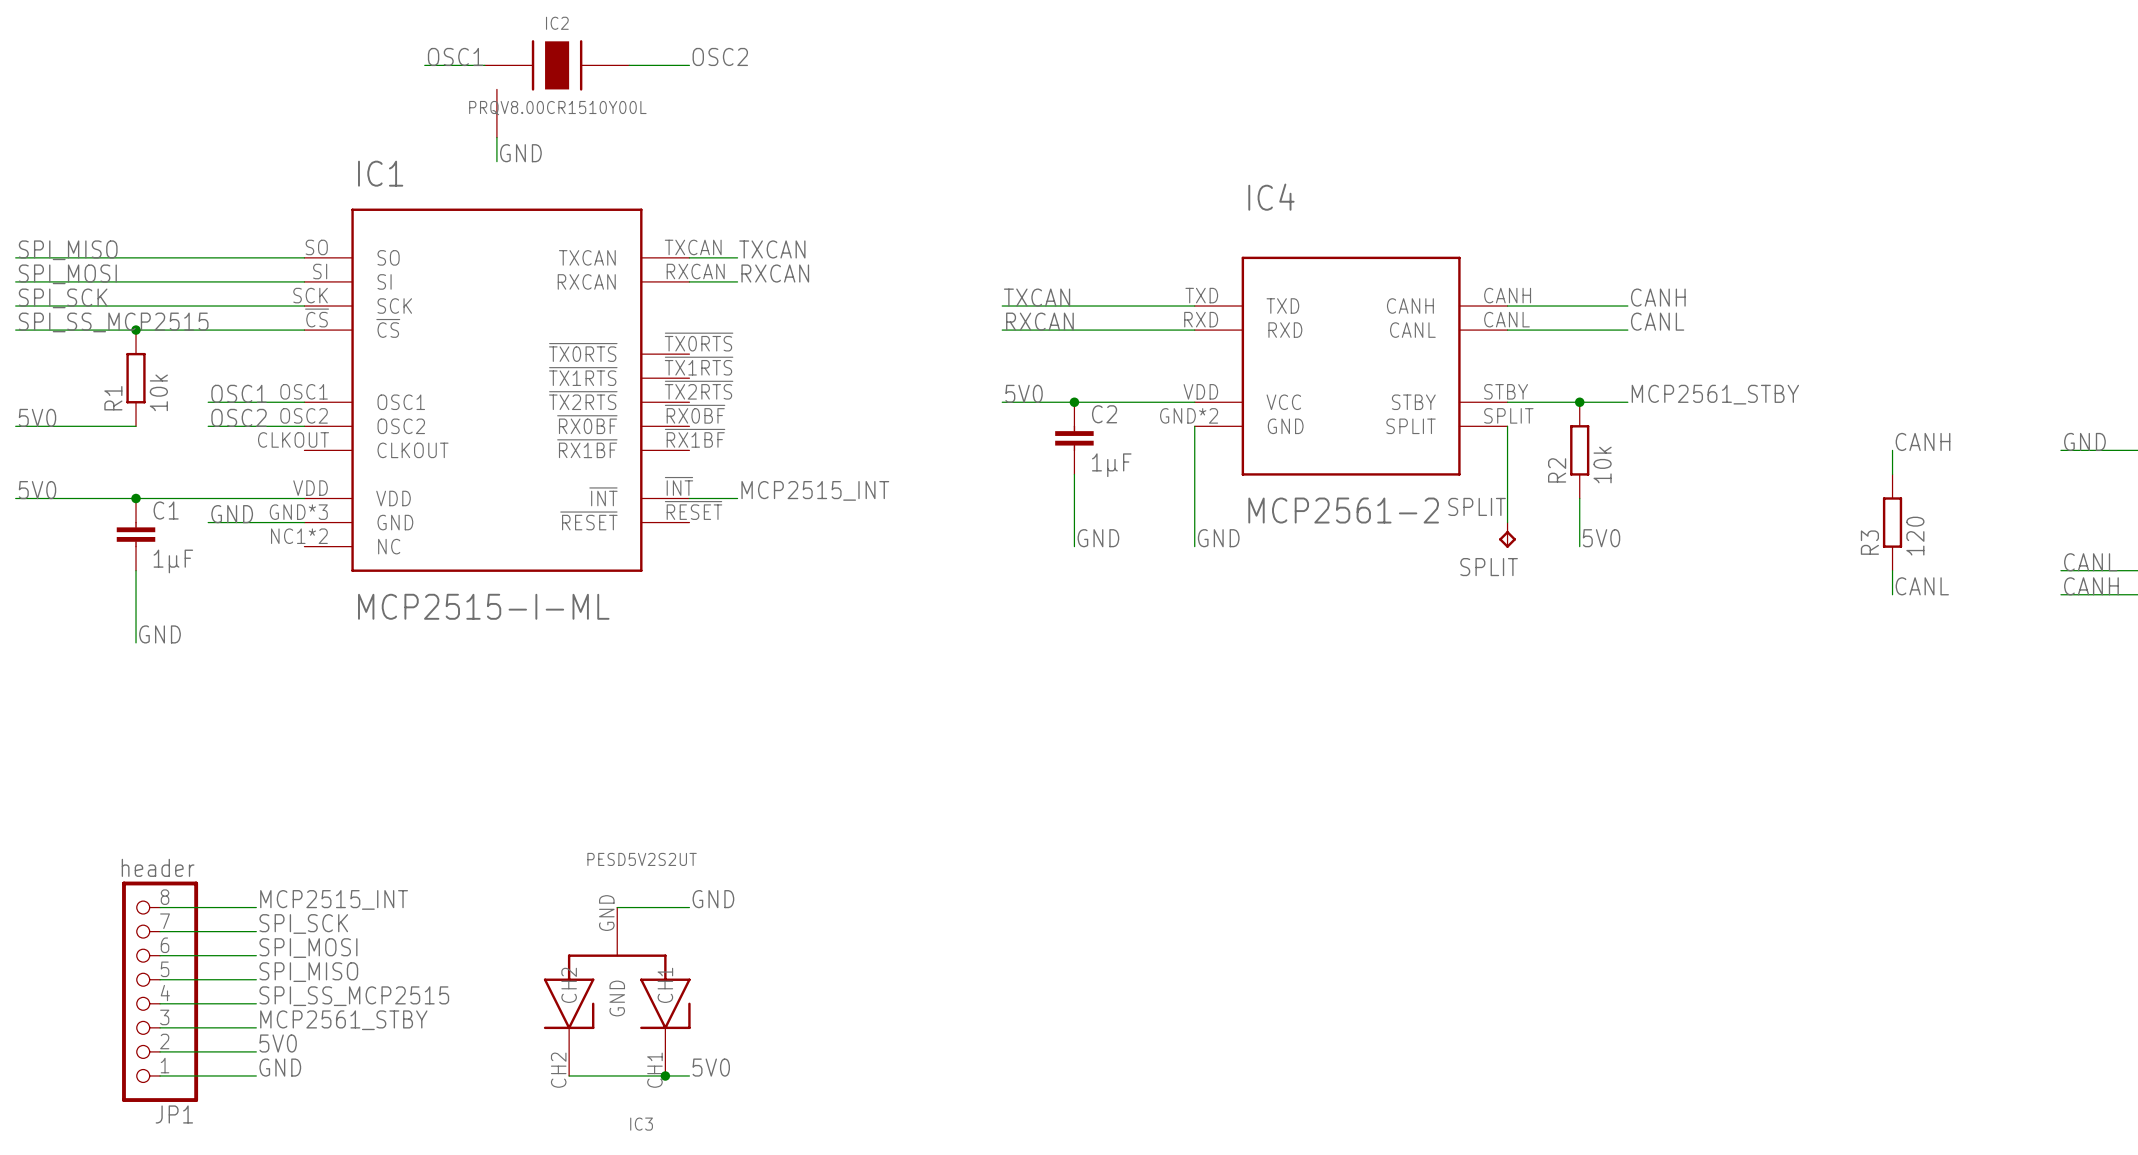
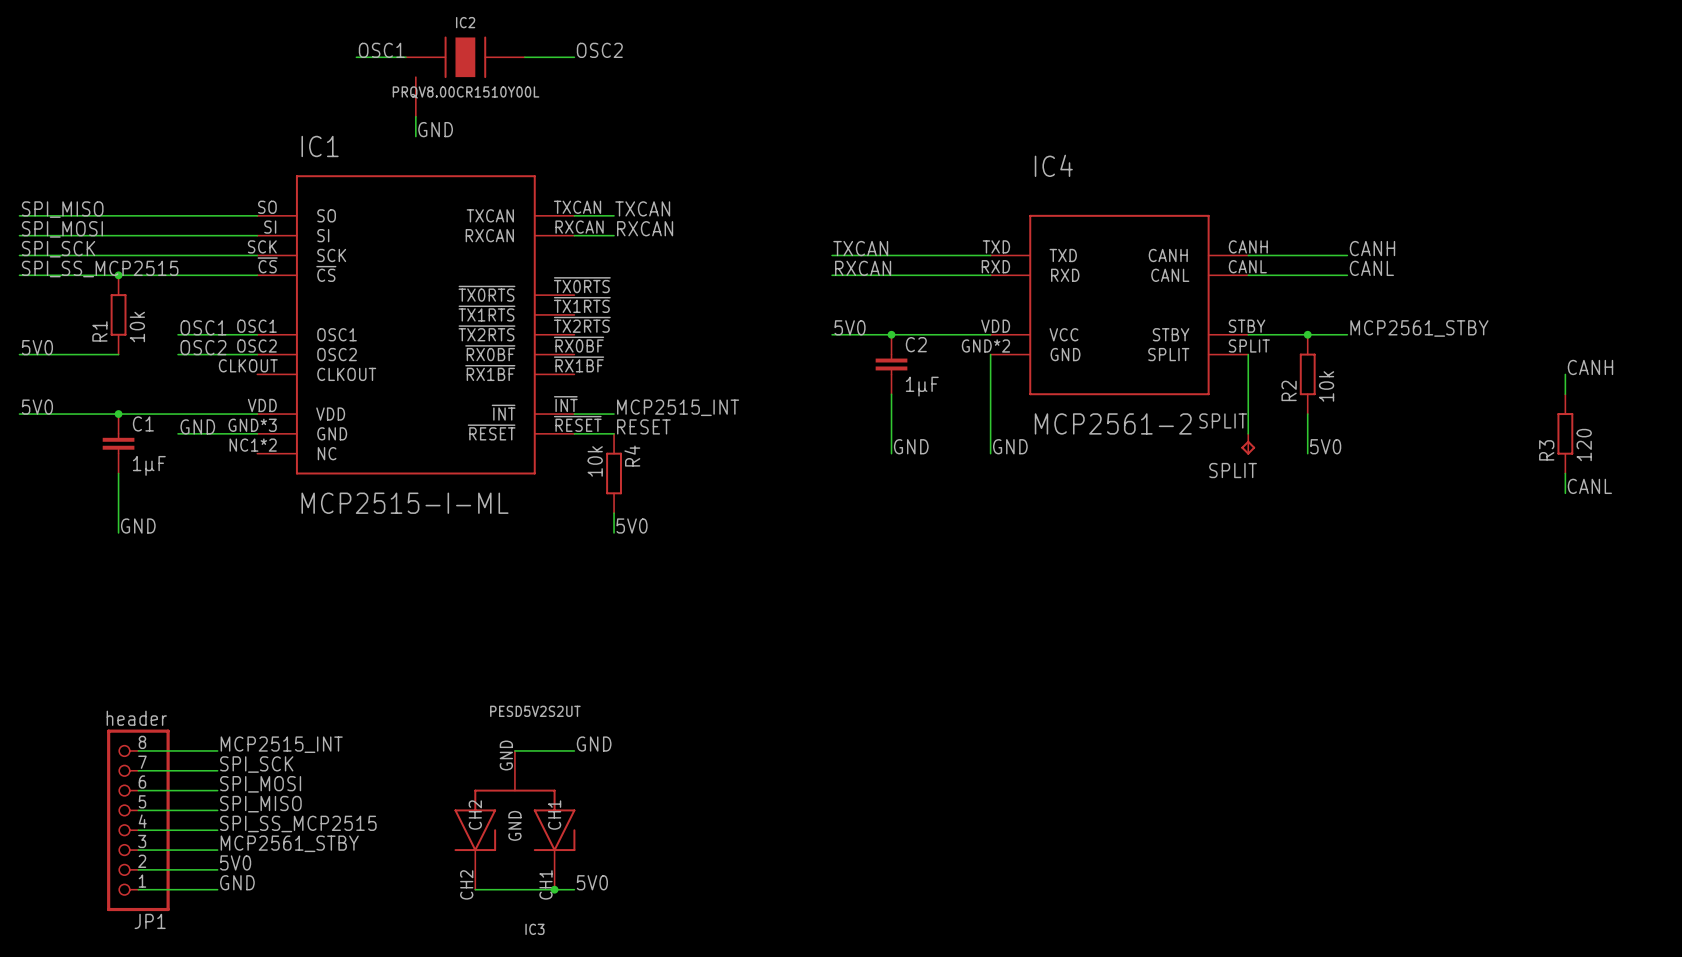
label: none -> RESET (643, 426)
wire: none -> (574, 433) (614, 433)
R4: none -> 10k (614, 473)
wire: none -> (614, 513) (614, 532)
label: none -> 5V0 (632, 526)

